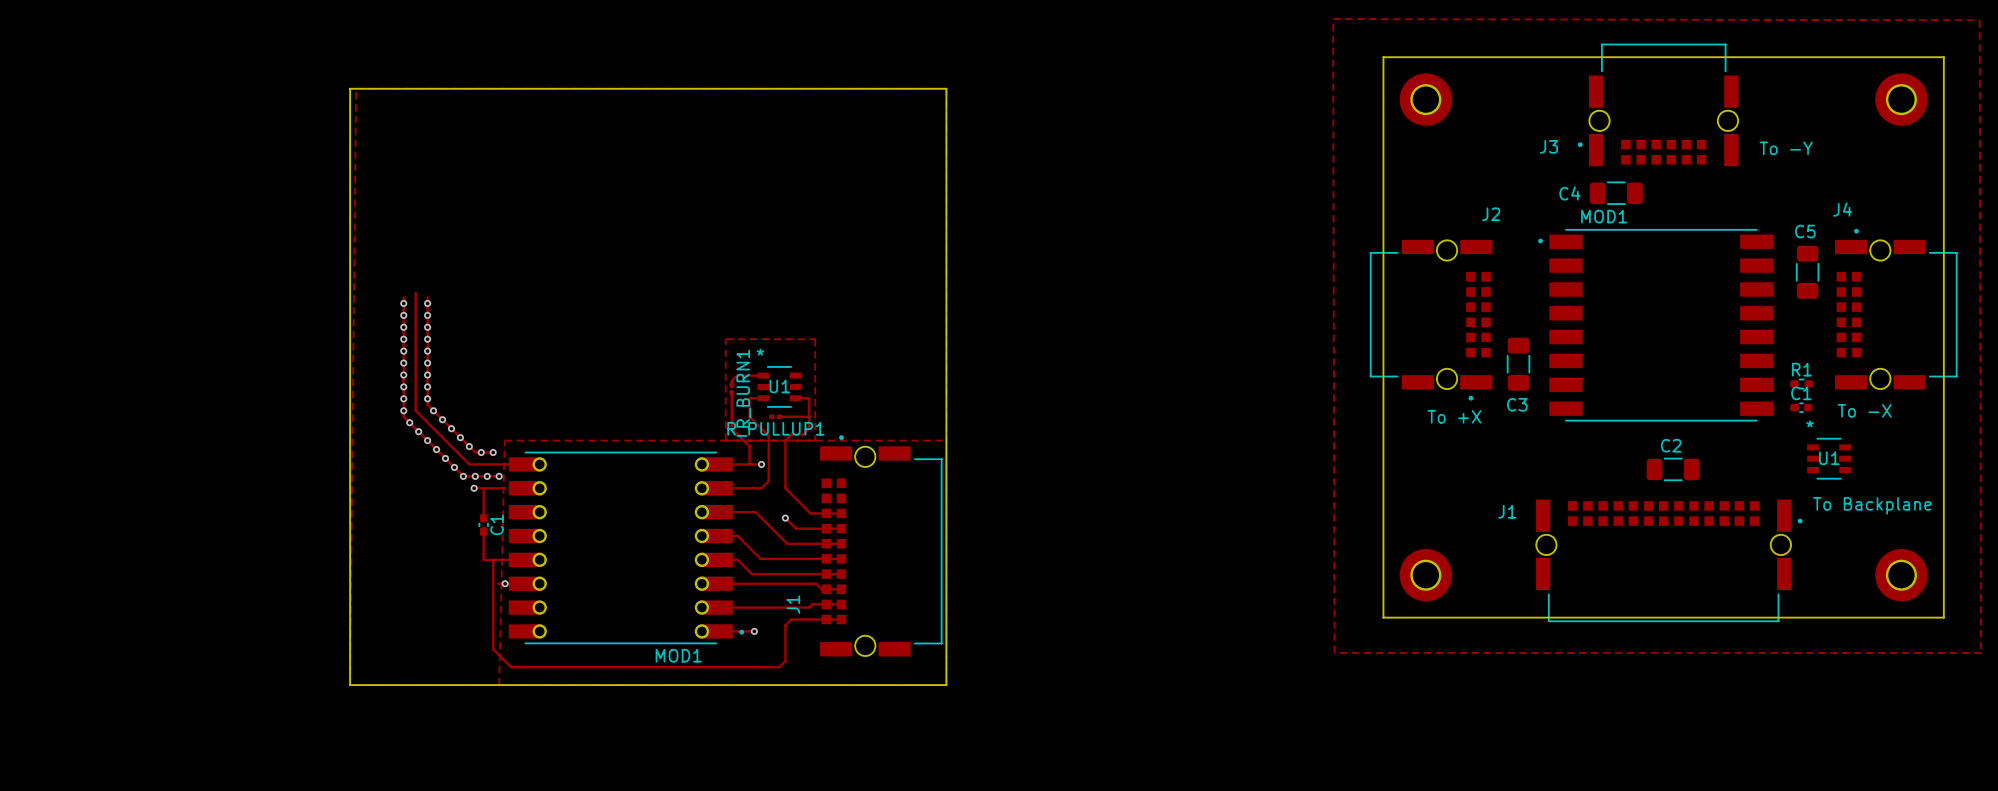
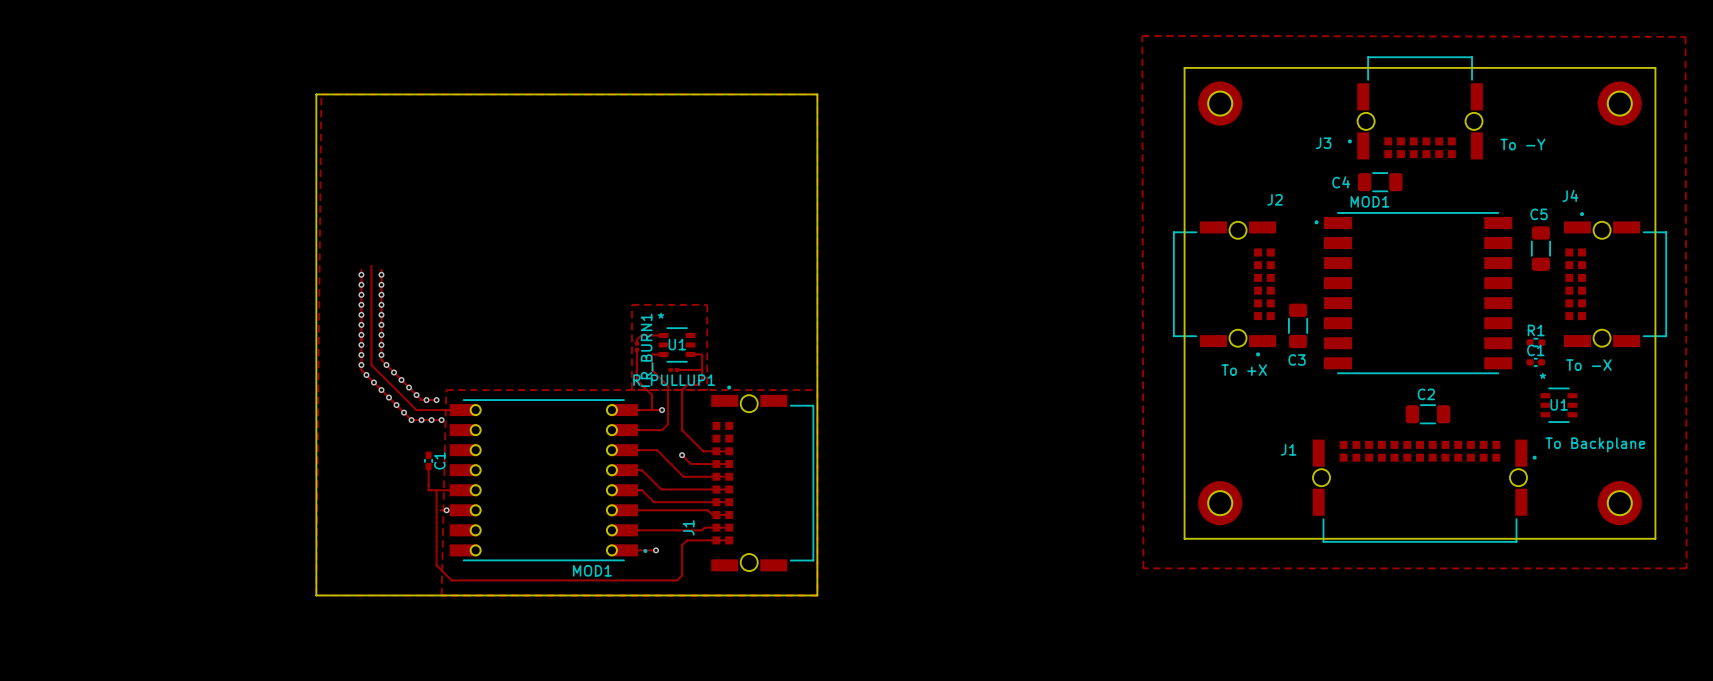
track: (474, 488) (505, 488) -> none
via: (474, 488) -> none
track: (483, 488) (483, 518) -> none

